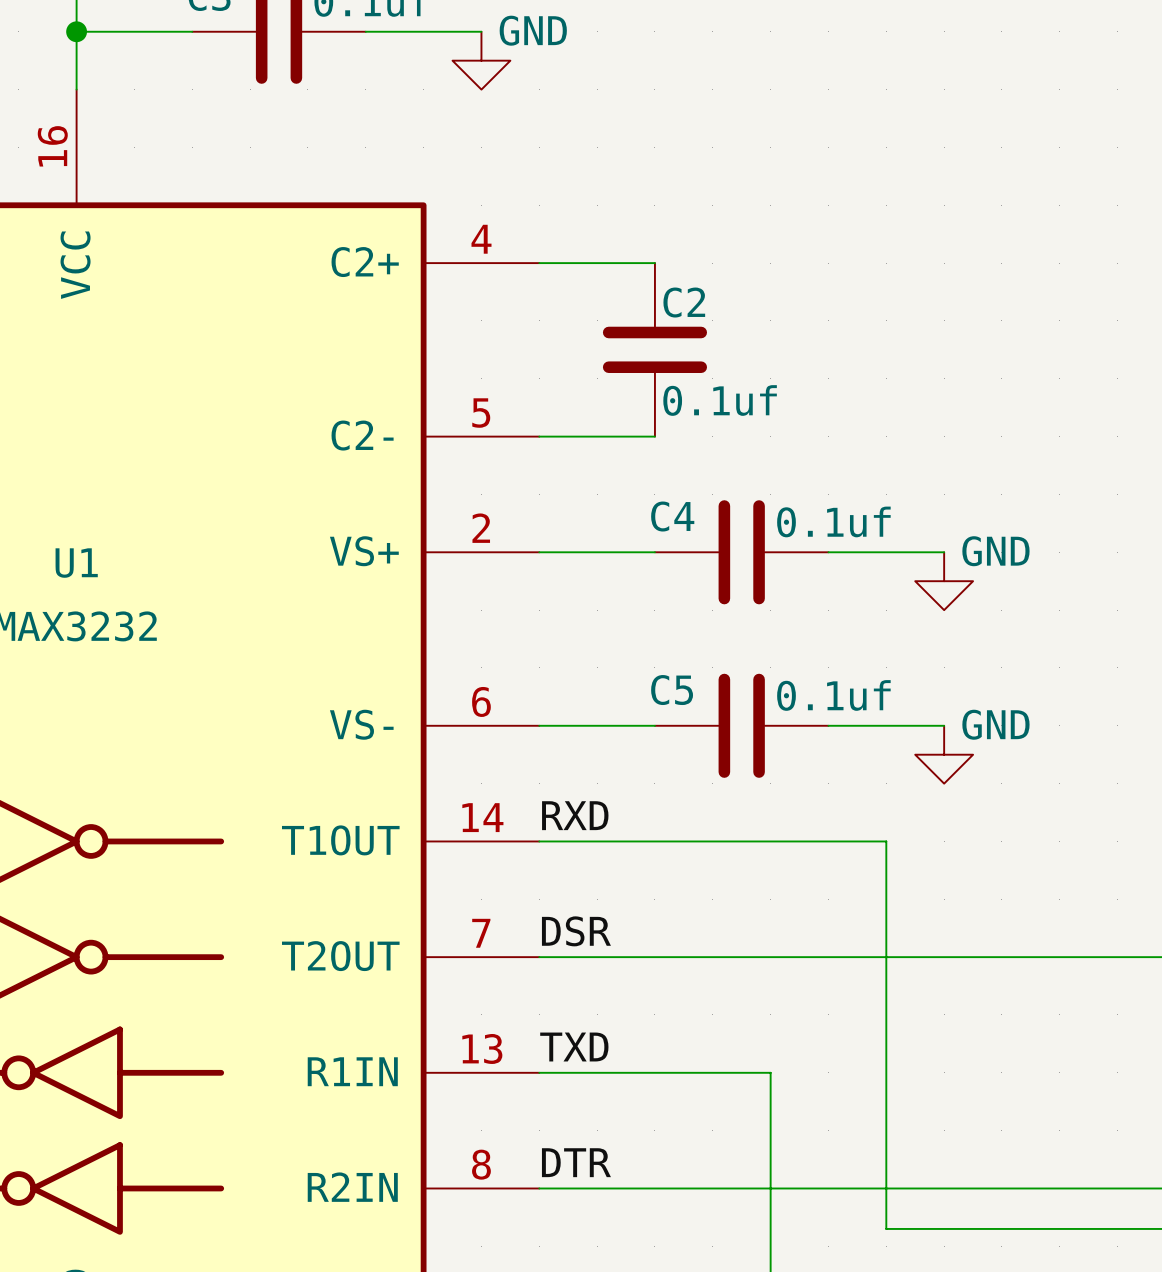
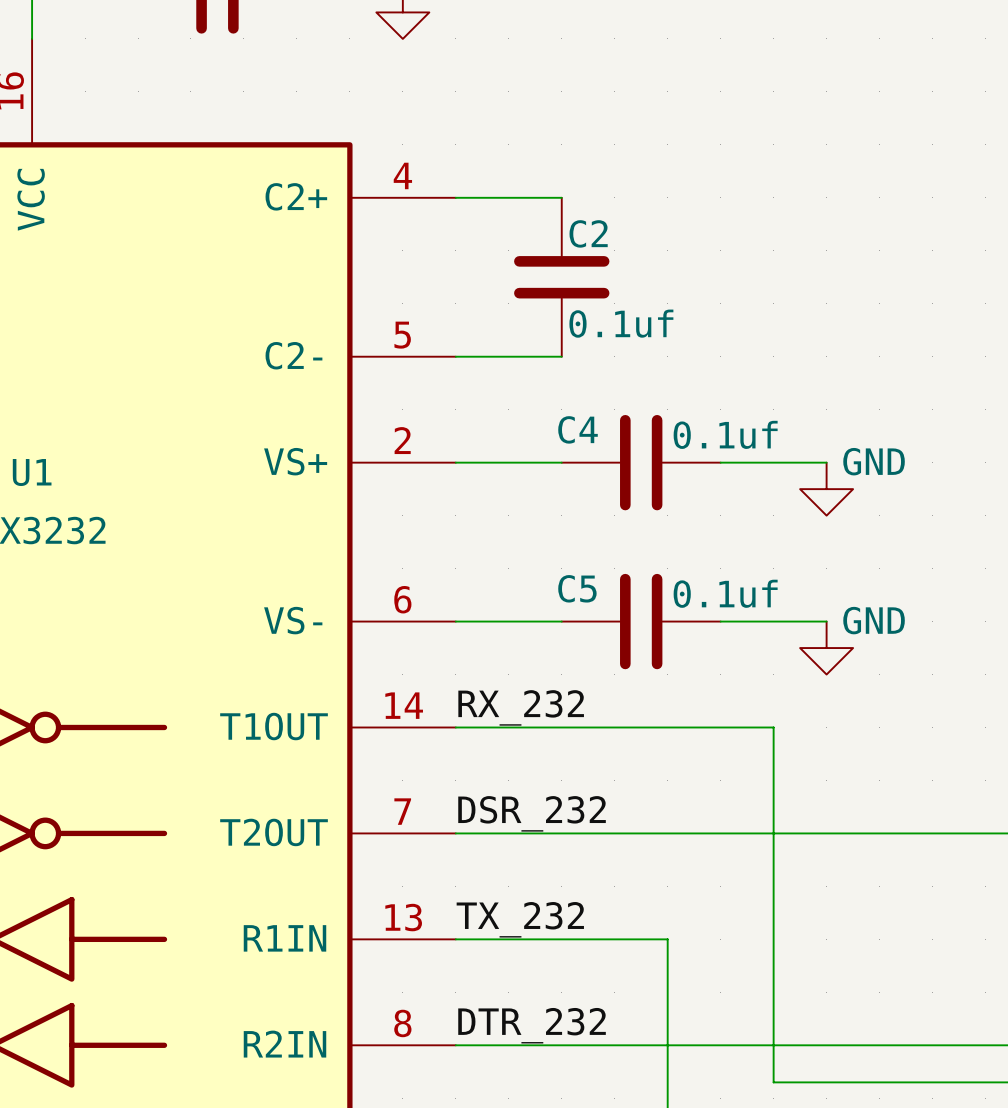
label: RXD (575, 815) -> RX_232 (521, 707)
label: DSR (576, 931) -> DSR_232 (532, 813)
label: TXD (574, 1047) -> TX_232 (520, 919)
label: DTR (576, 1162) -> DTR_232 (532, 1025)

